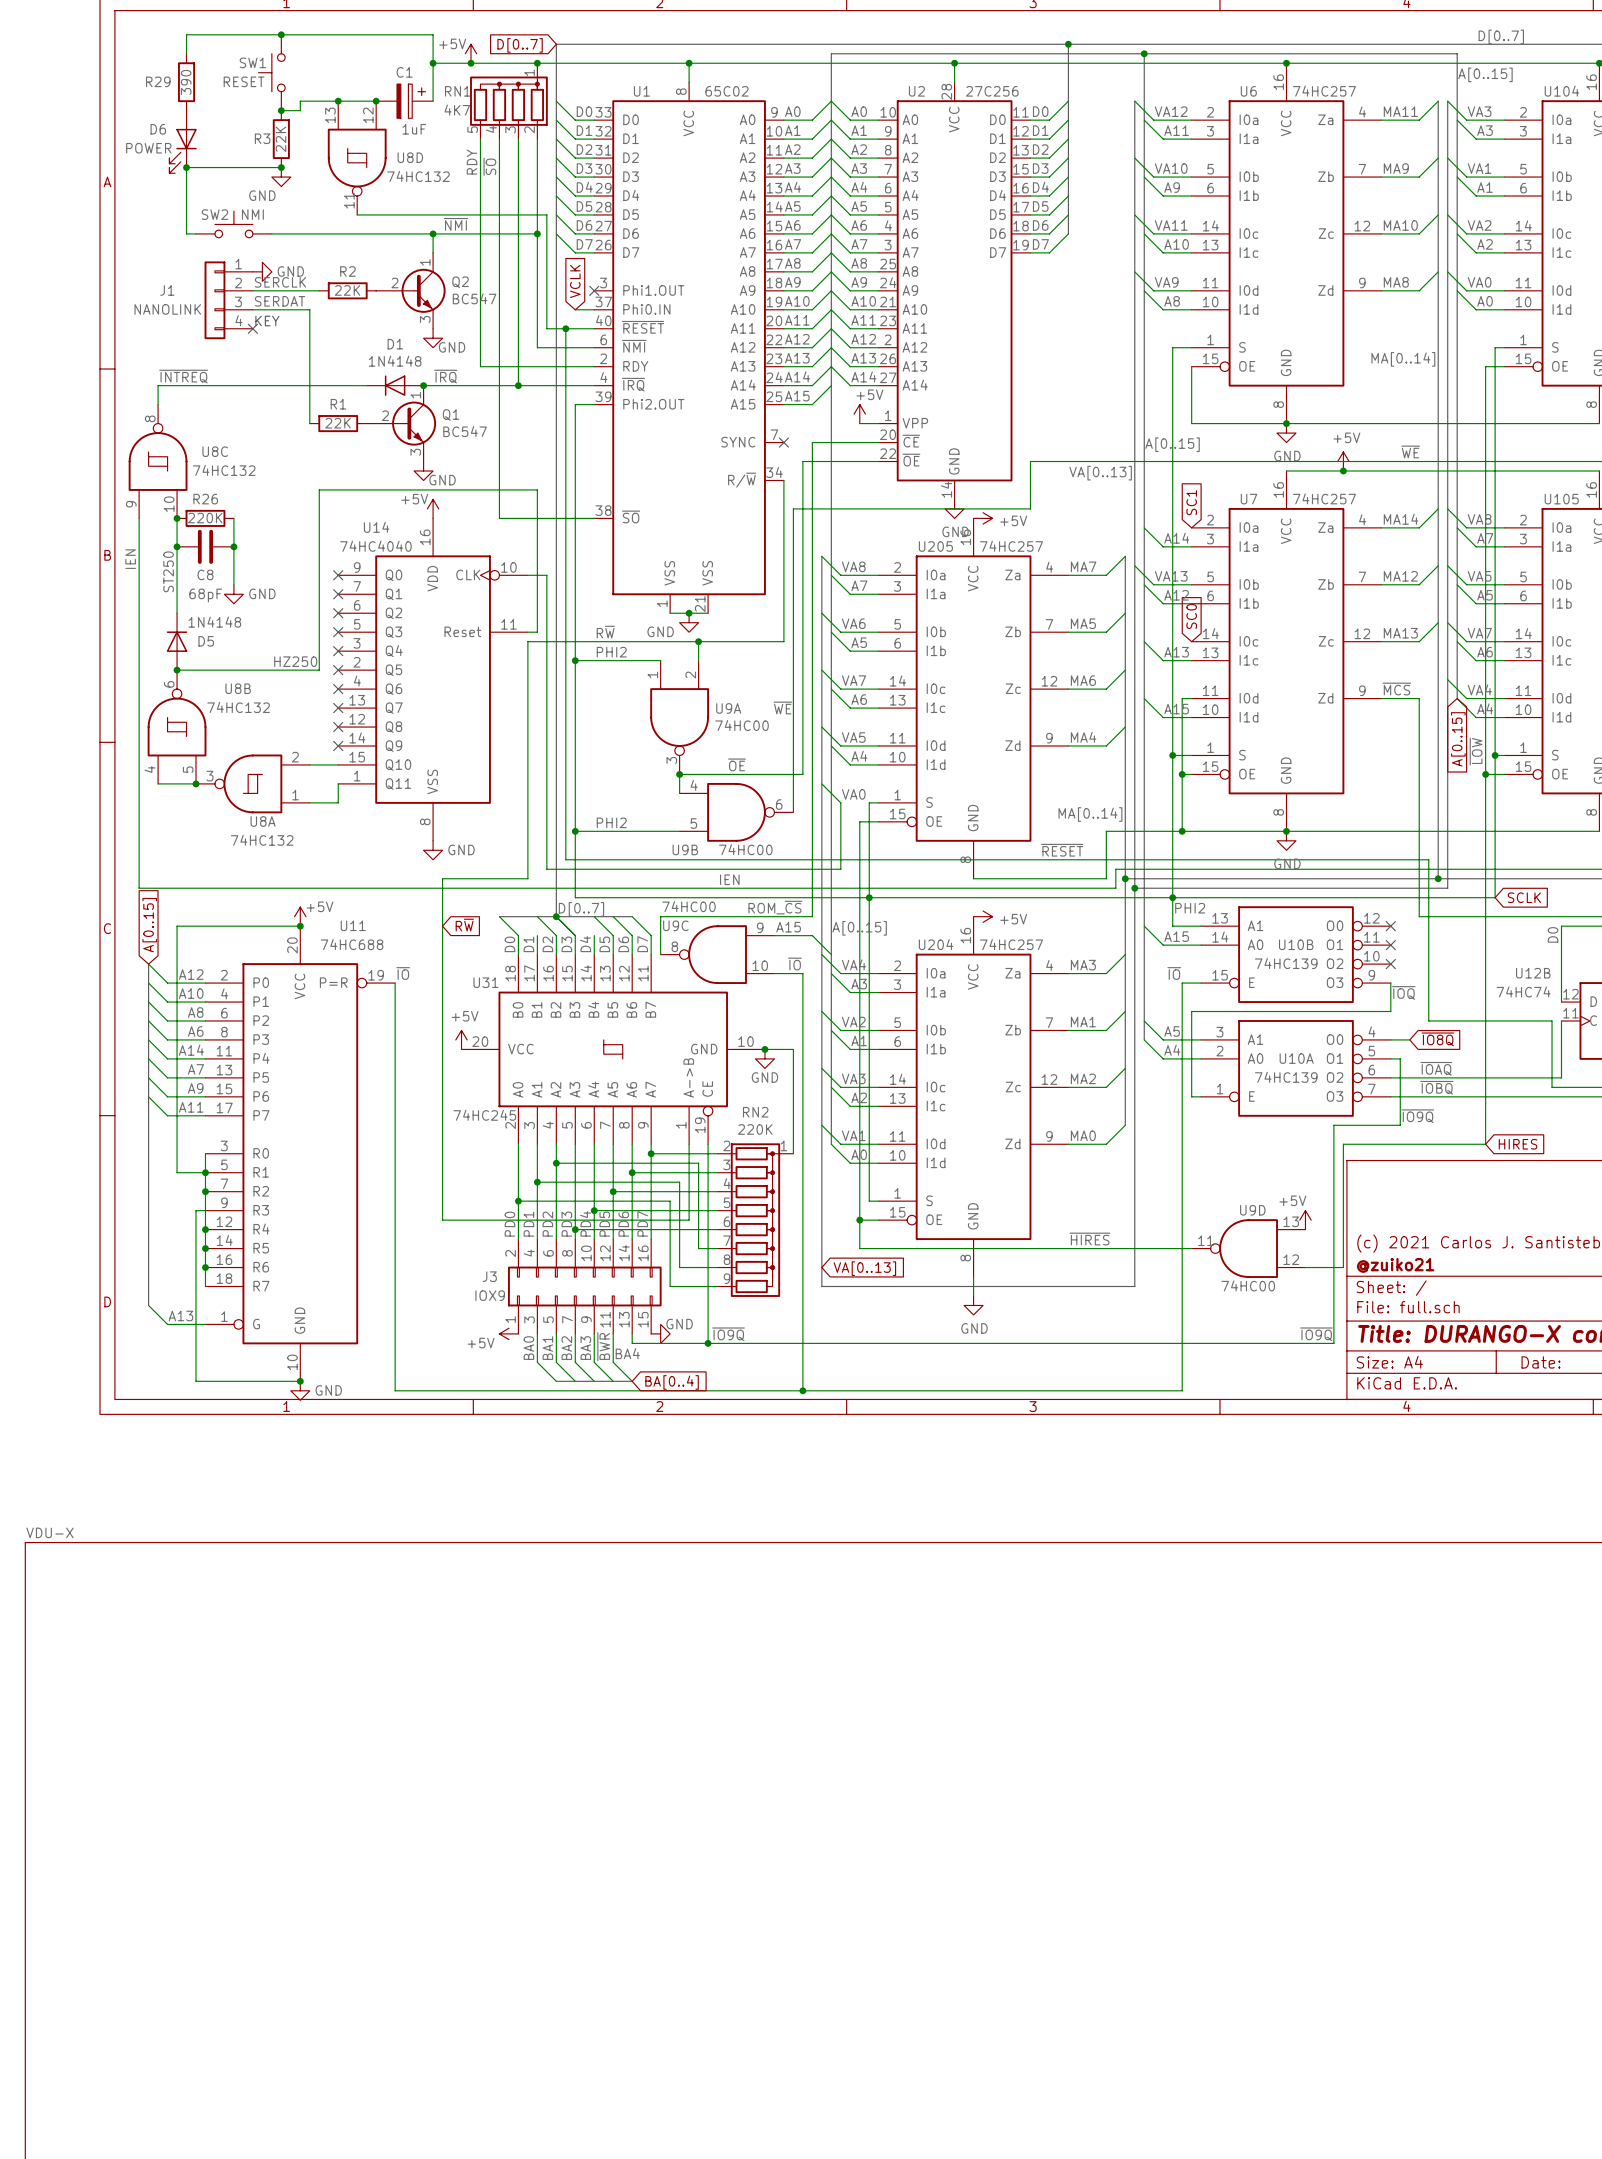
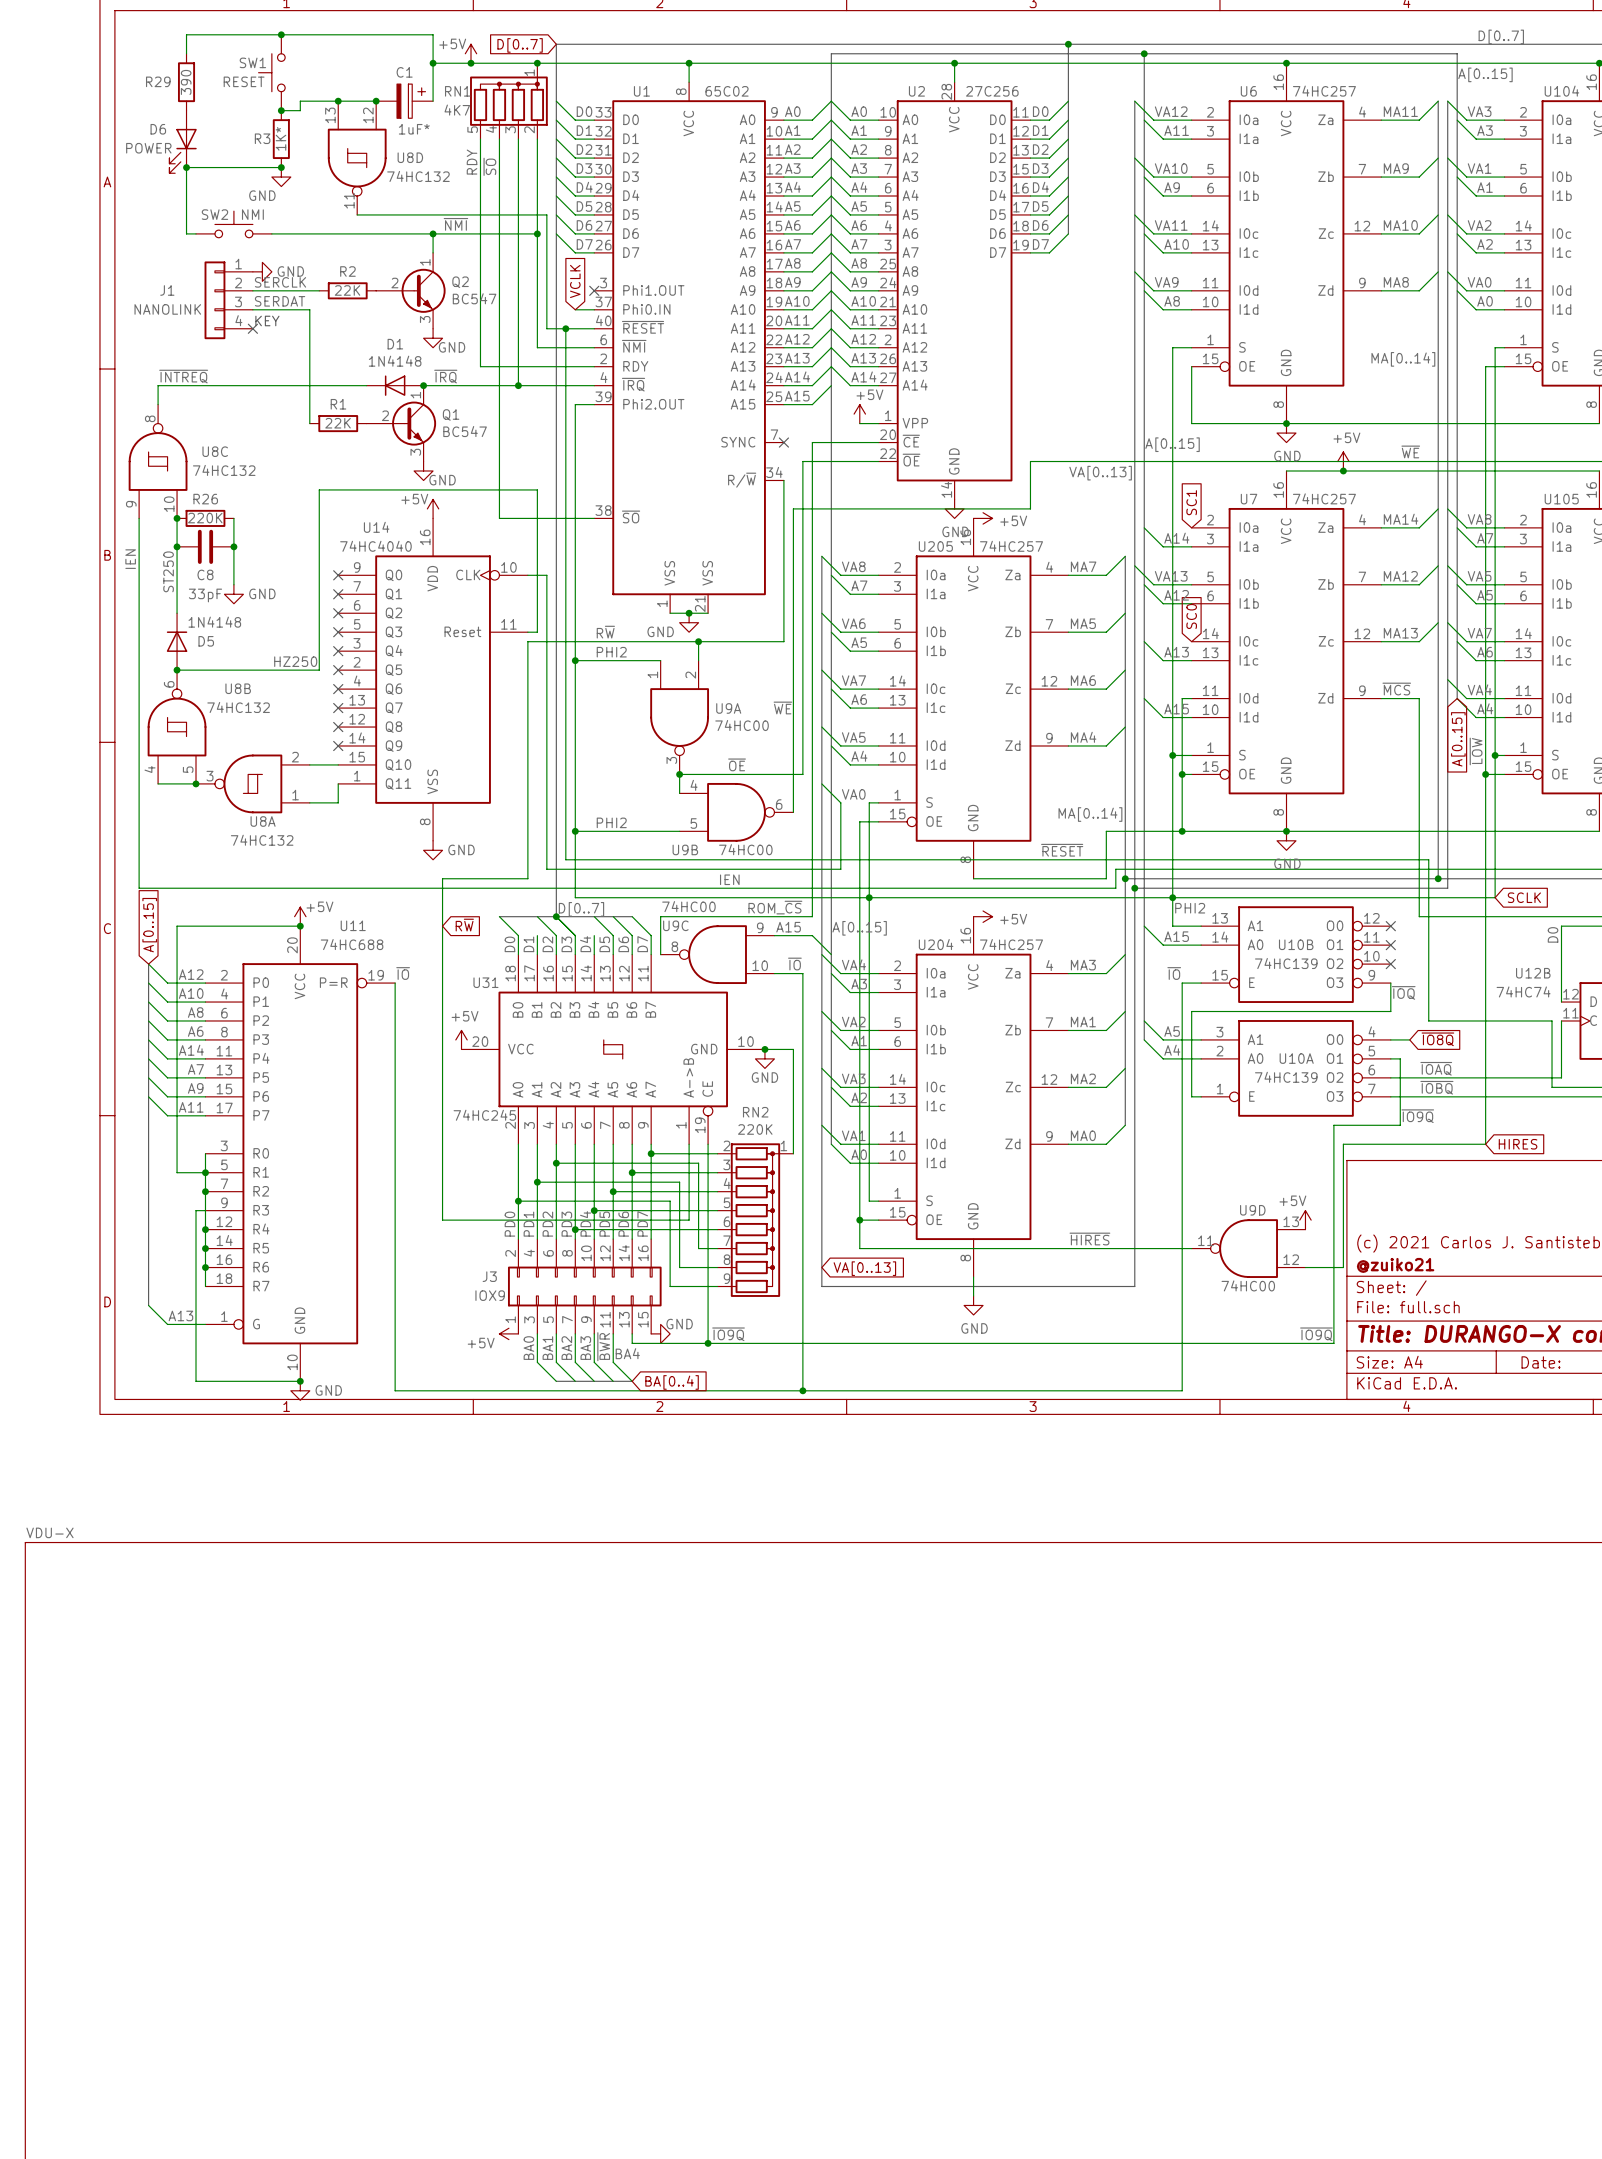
C1 value: 1uF (414, 129) -> 1uF* (414, 129)
R3 value: 22K (280, 139) -> 1K* (280, 138)
C8 value: 68pF (205, 595) -> 33pF (205, 595)

